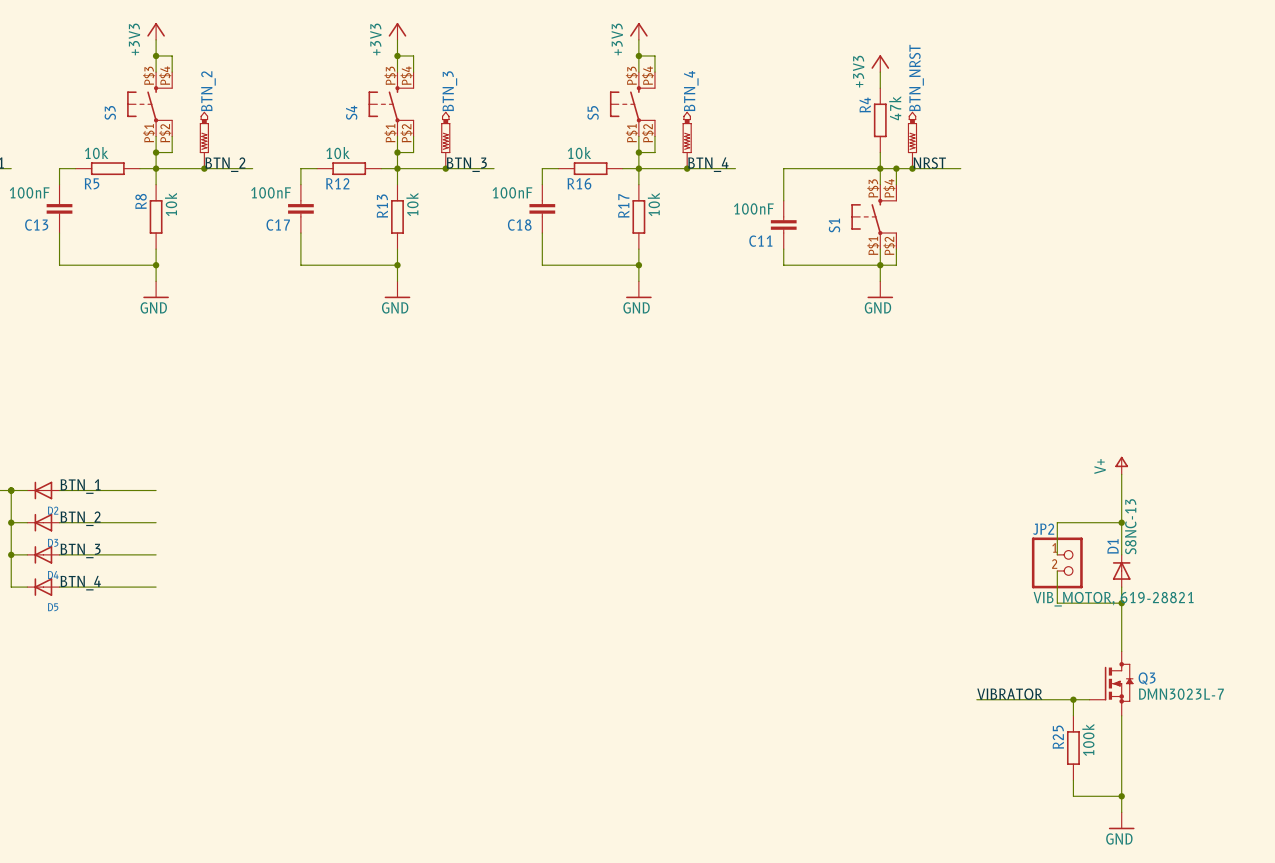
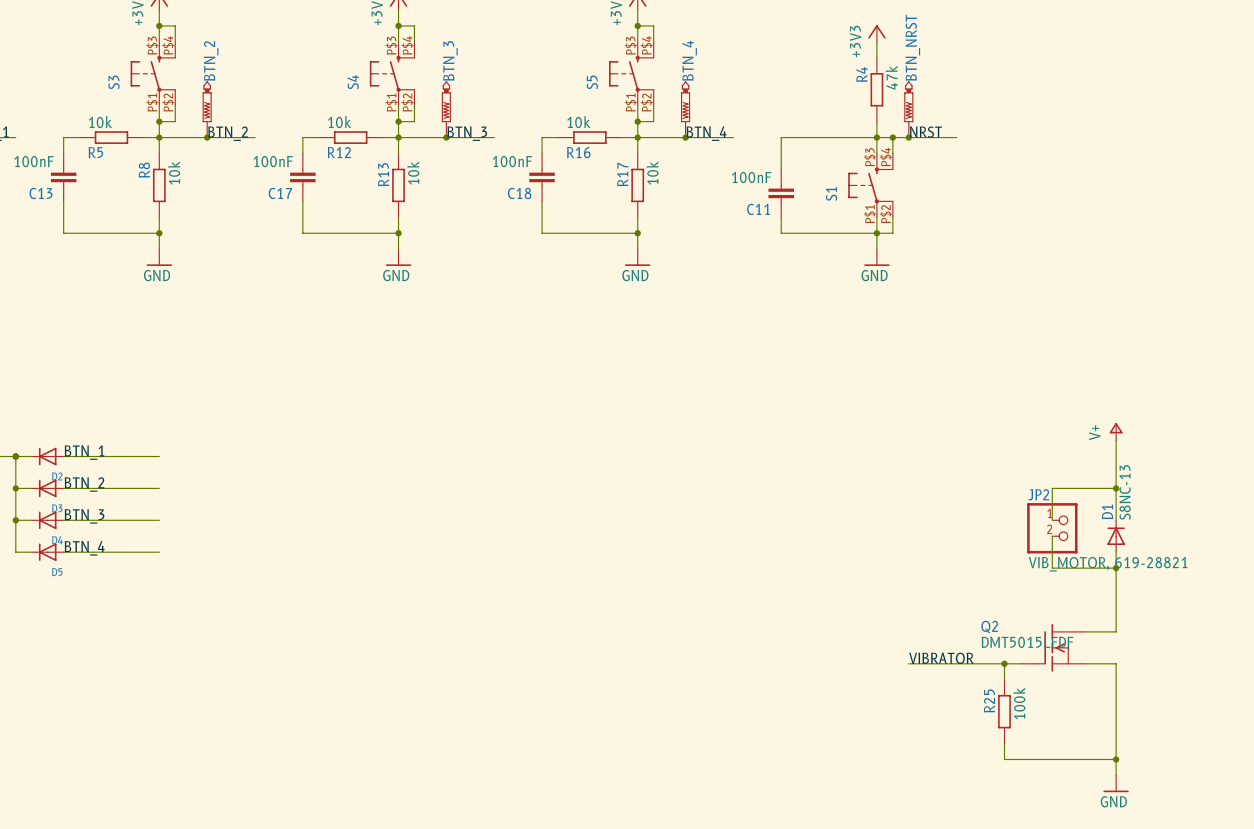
wire: none -> (1116, 615) (1116, 631) (1084, 631)
Q2: none -> DMT5015LFDF (1052, 647)
Q3: DMN3023L-7 (1111, 683) -> none
label position: VIBRATOR (1009, 694) -> VIBRATOR (941, 658)
wire: none -> (908, 663) (972, 663)
junction: none -> (1004, 663)
wire: (1073, 699) (1073, 715) -> (1004, 663) (1004, 679)
junction: (1073, 699) -> none
R25 position: (1073, 748) -> (1004, 711)
wire: (1073, 780) (1073, 796) -> (1004, 743) (1004, 759) (1068, 759)

